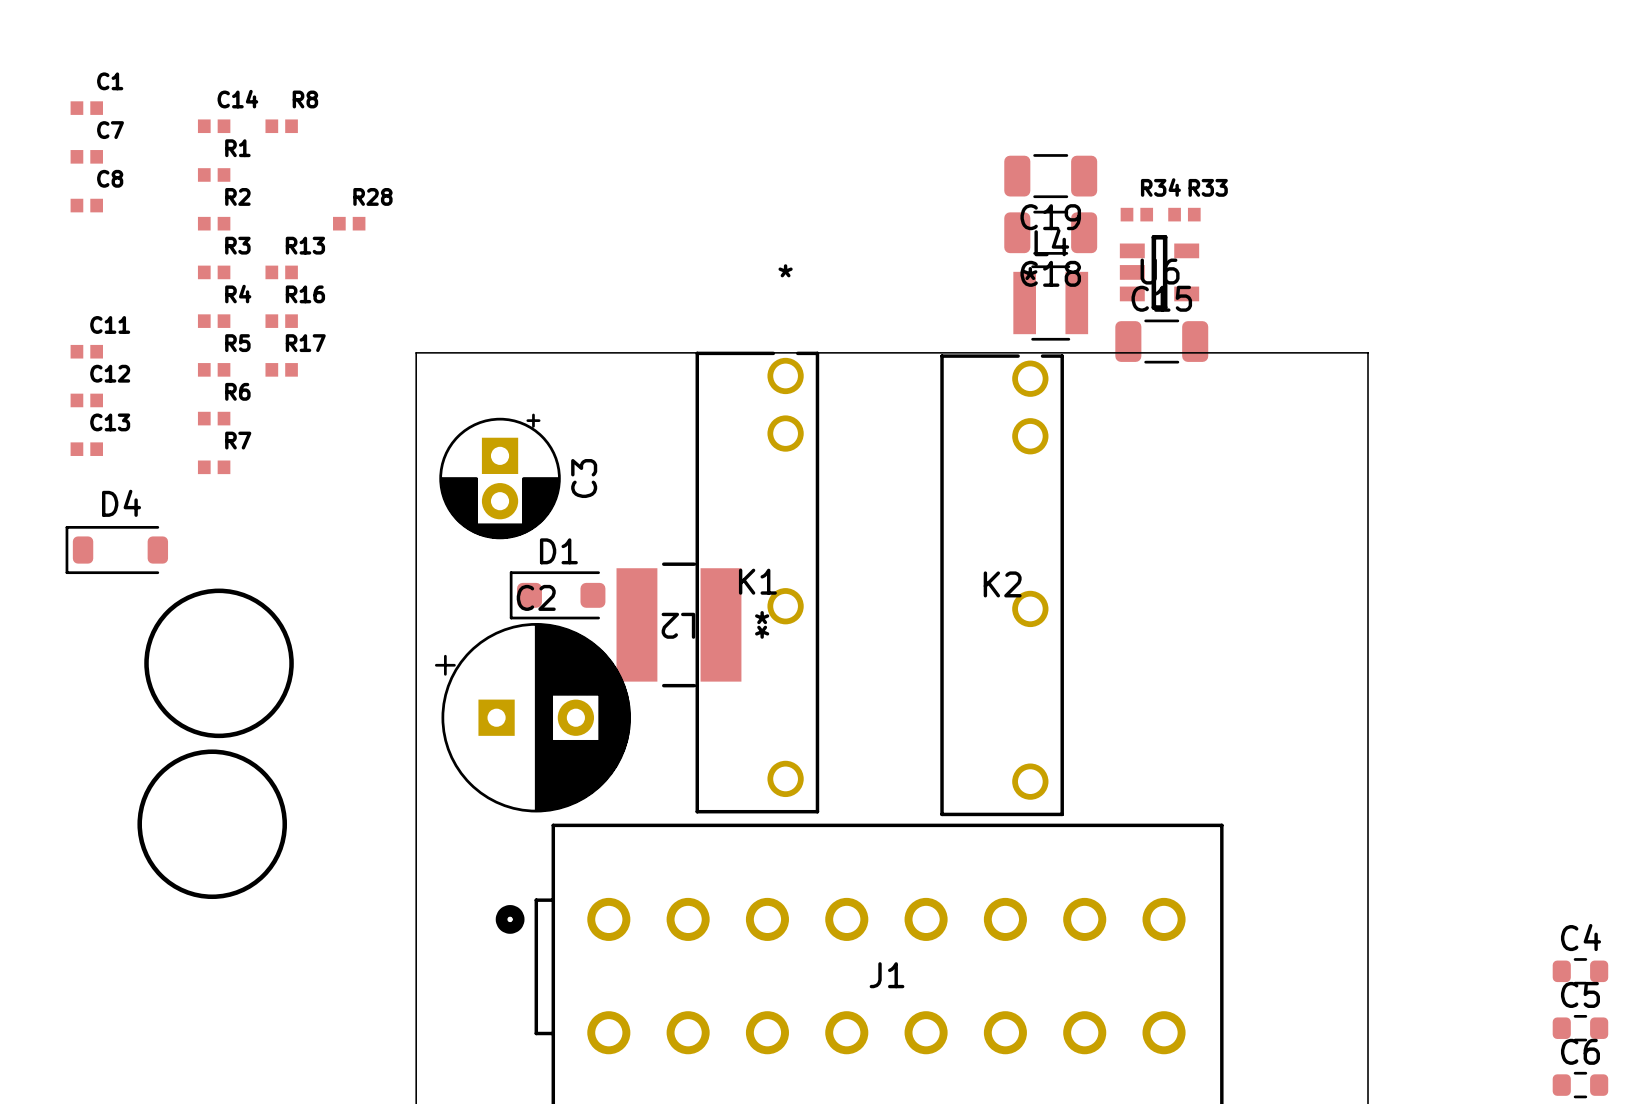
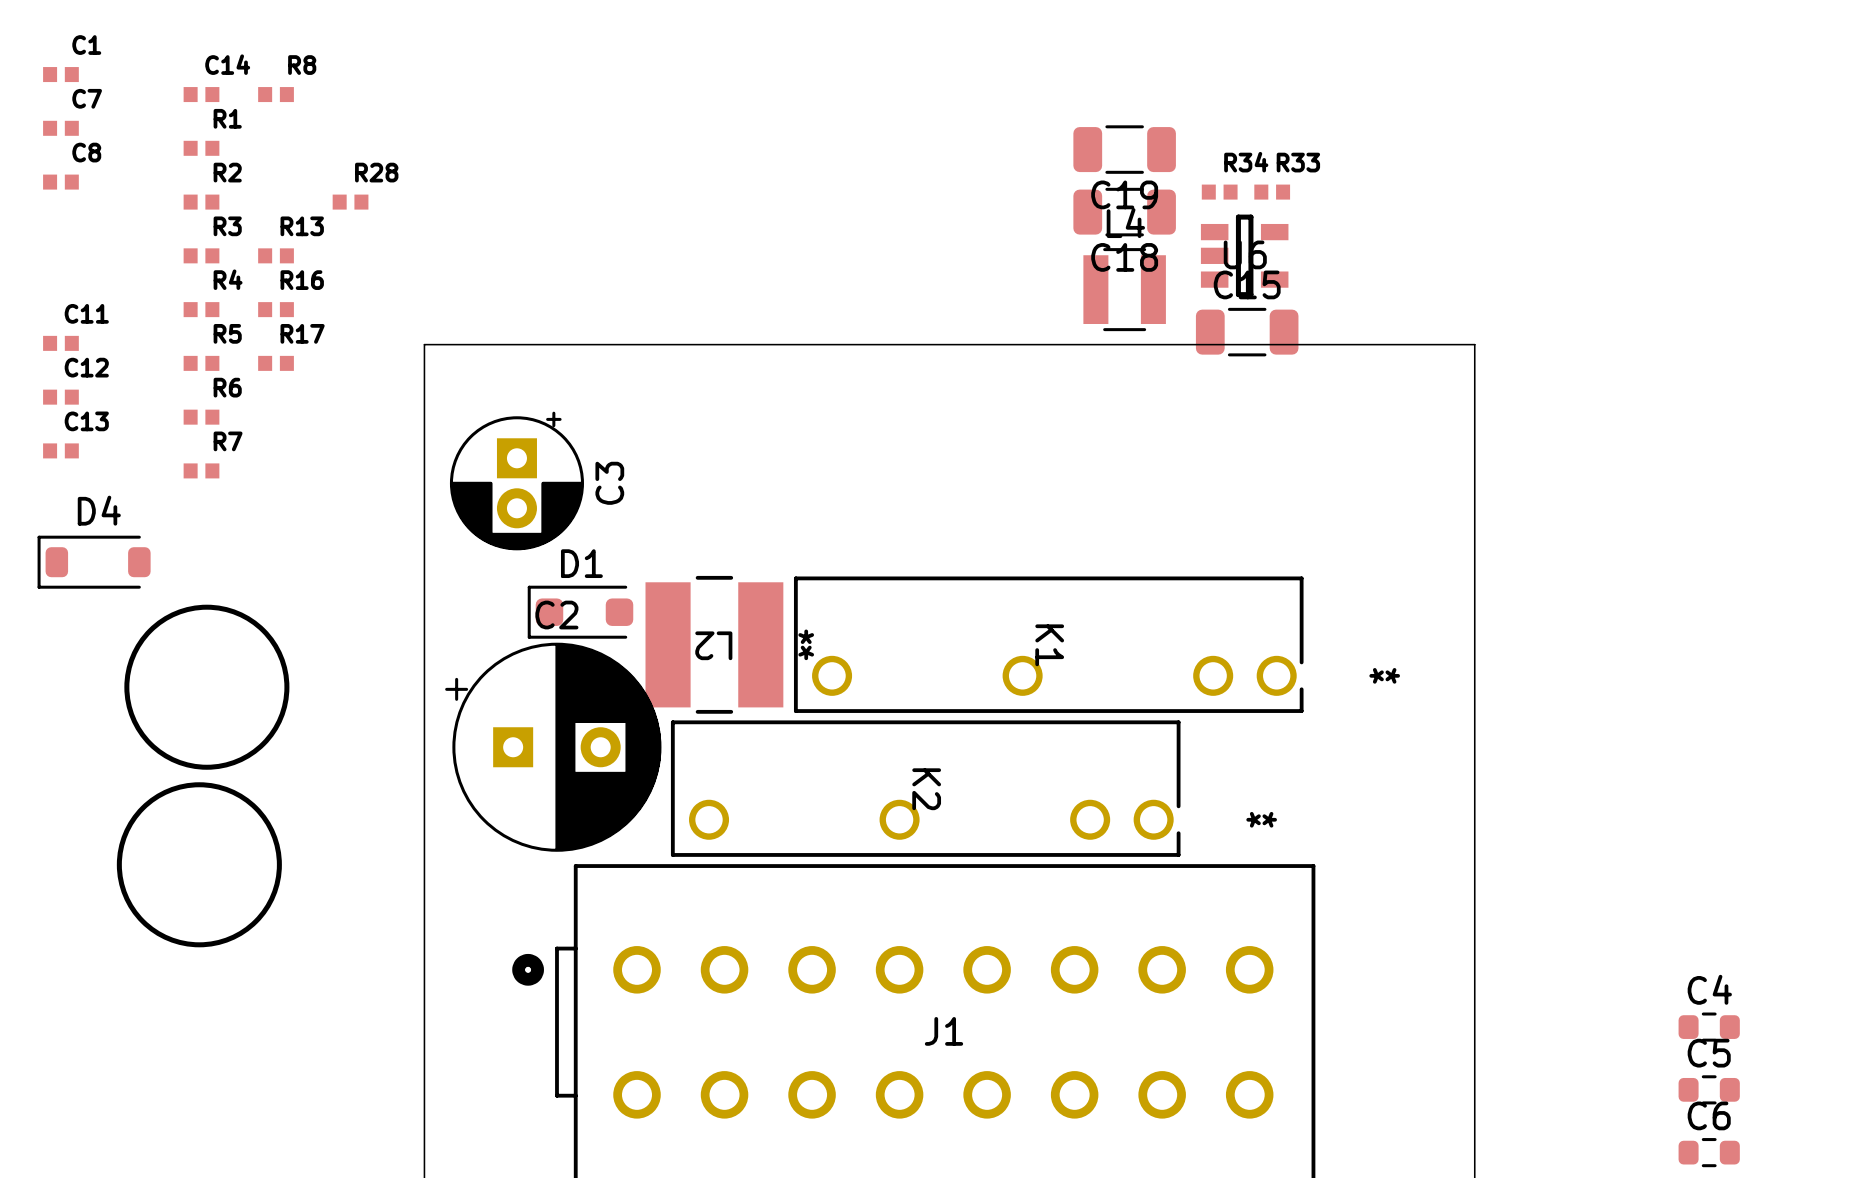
K1 rotation: 0° (757, 582) -> 90° clockwise (1048, 644)
K2 rotation: 0° (1002, 585) -> 90° clockwise (925, 788)

